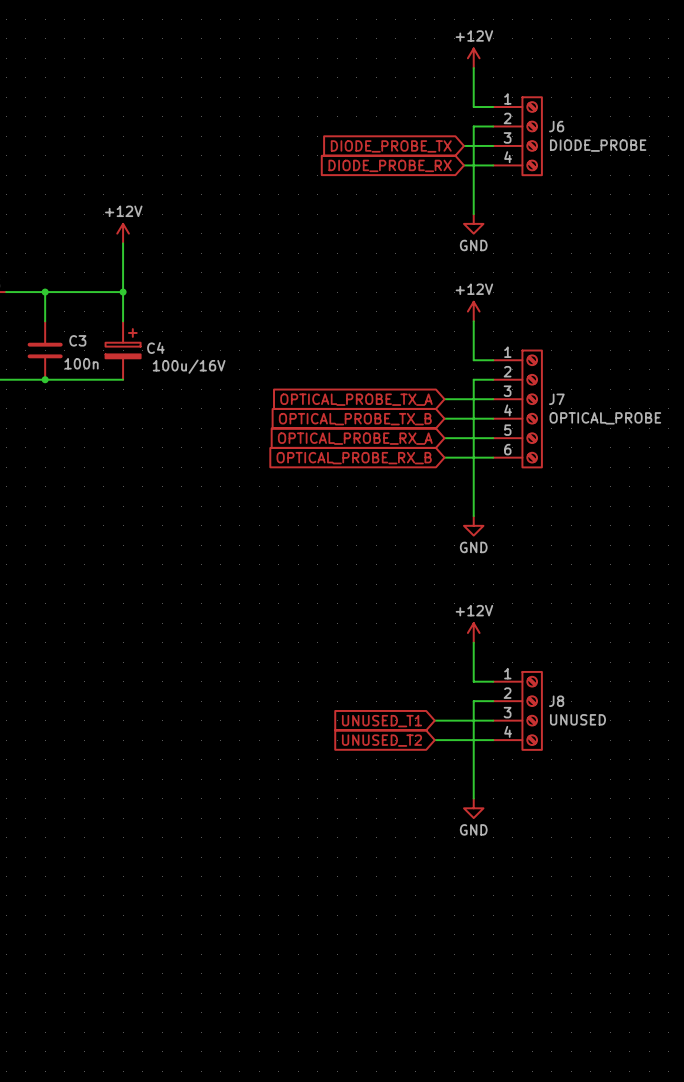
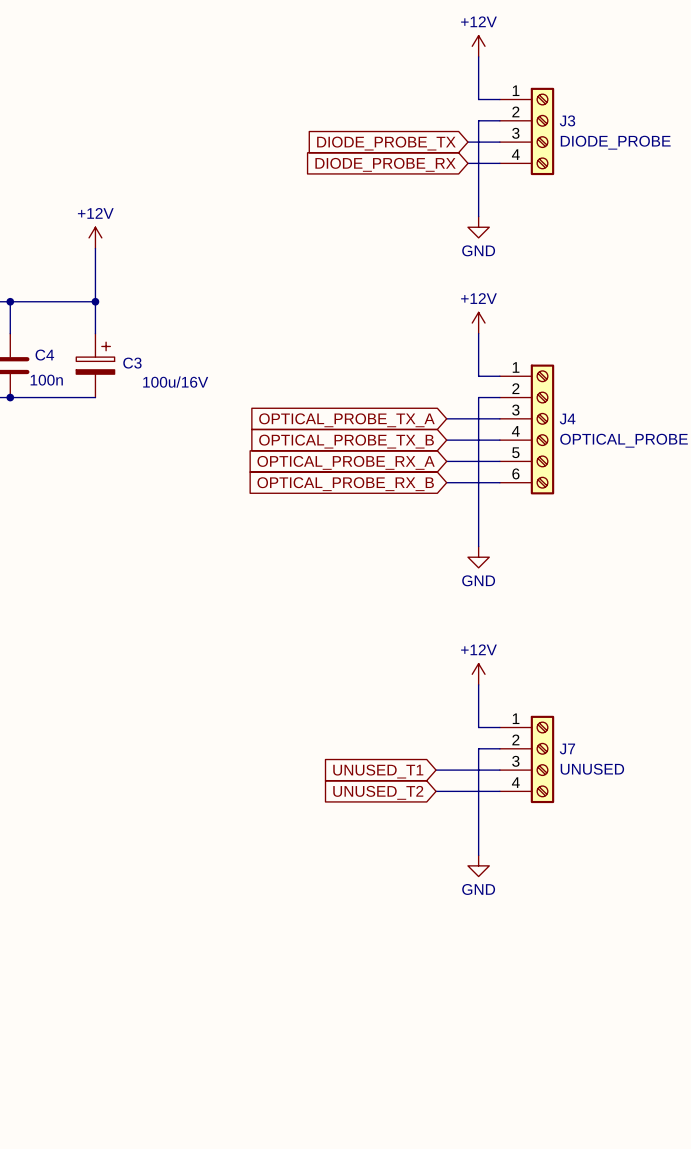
J6 name: J6 (556, 126) -> J3 (567, 120)
C3 name: C3 (77, 340) -> C4 (44, 355)
C4 name: C4 (155, 347) -> C3 (132, 363)
J7 name: J7 (556, 399) -> J4 (567, 419)
J8 name: J8 (556, 701) -> J7 (567, 748)

